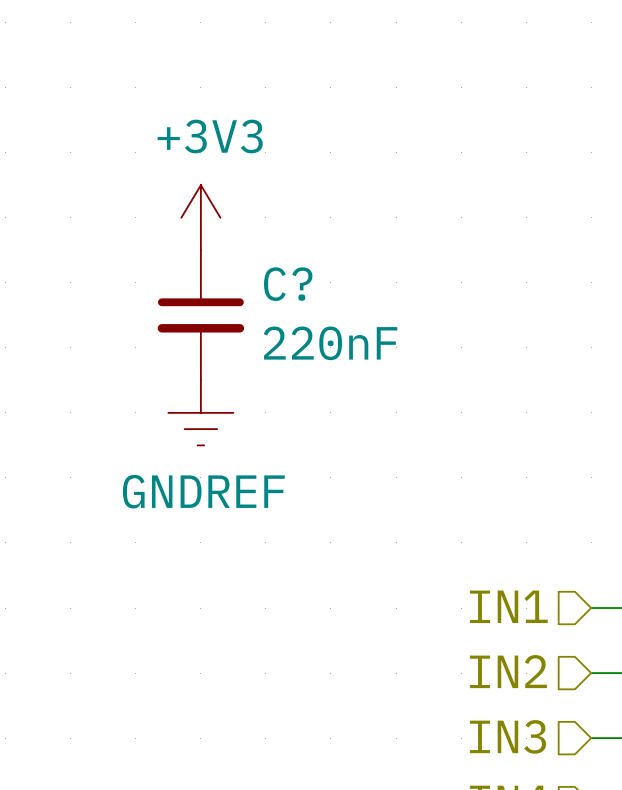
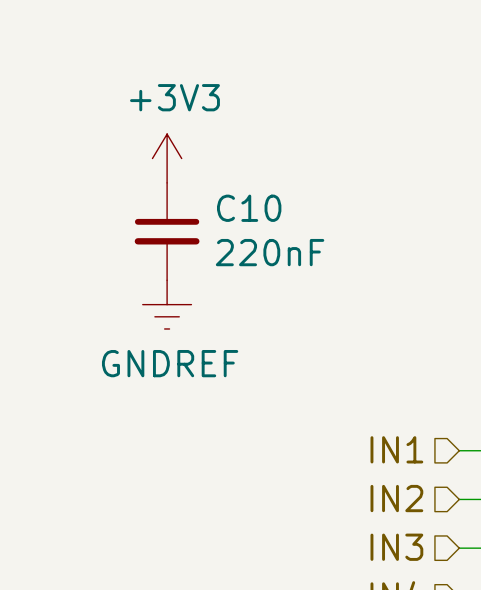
C? name: C? (288, 284) -> C10 (249, 208)

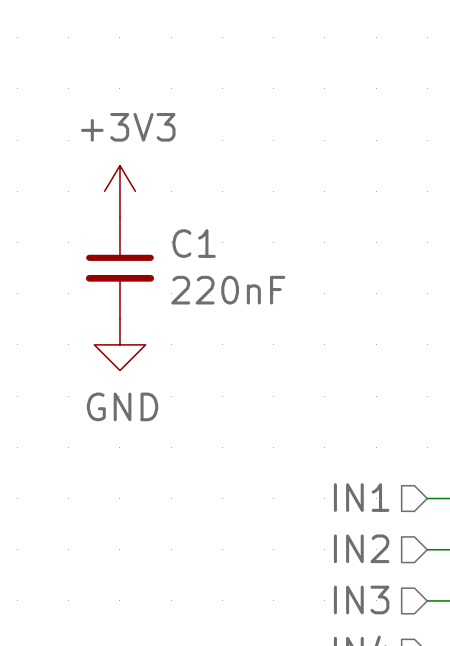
C10 name: C10 (249, 208) -> C1 (194, 243)
power symbol: GNDREF (167, 304) -> GND (119, 344)

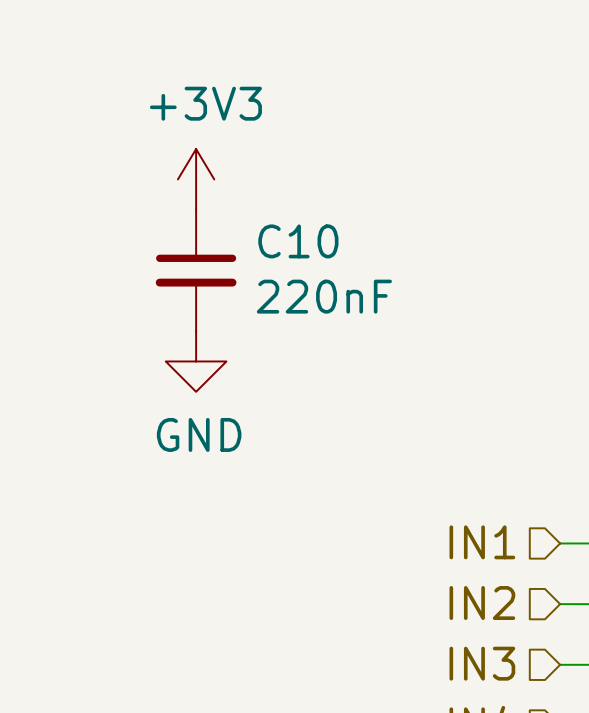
C1 name: C1 (194, 243) -> C10 (298, 241)

